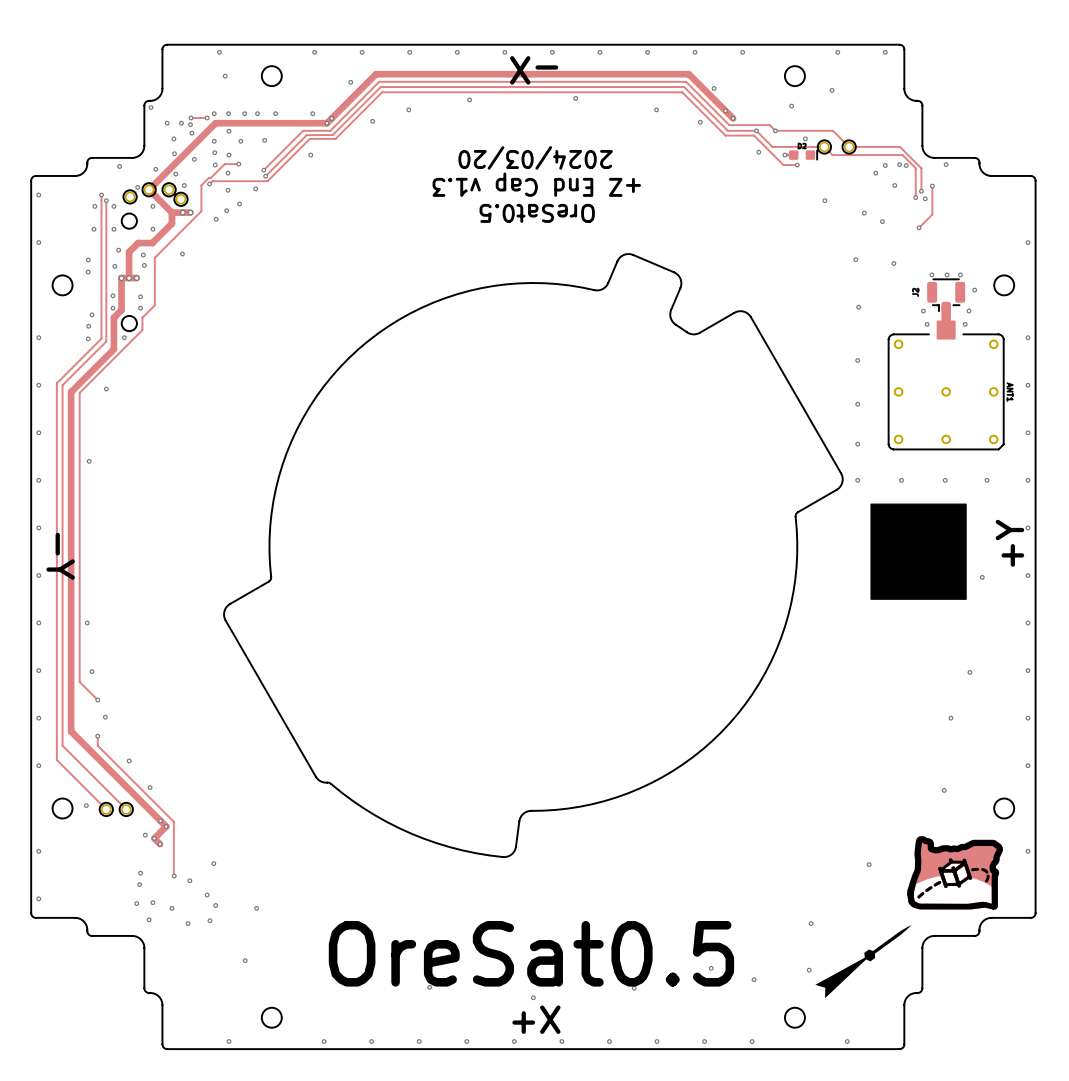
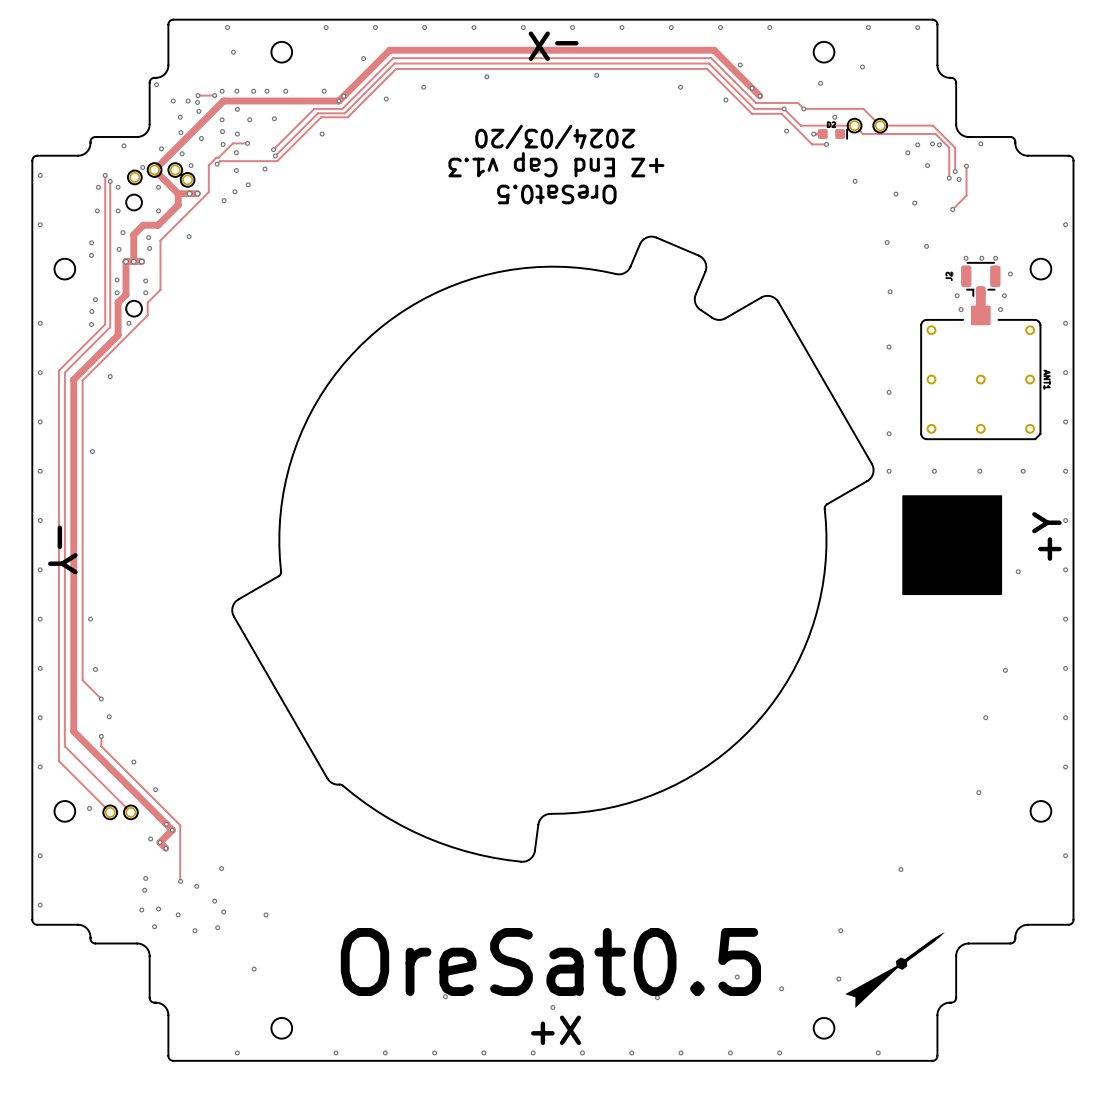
drawing: [907, 836, 1003, 910] -> none

